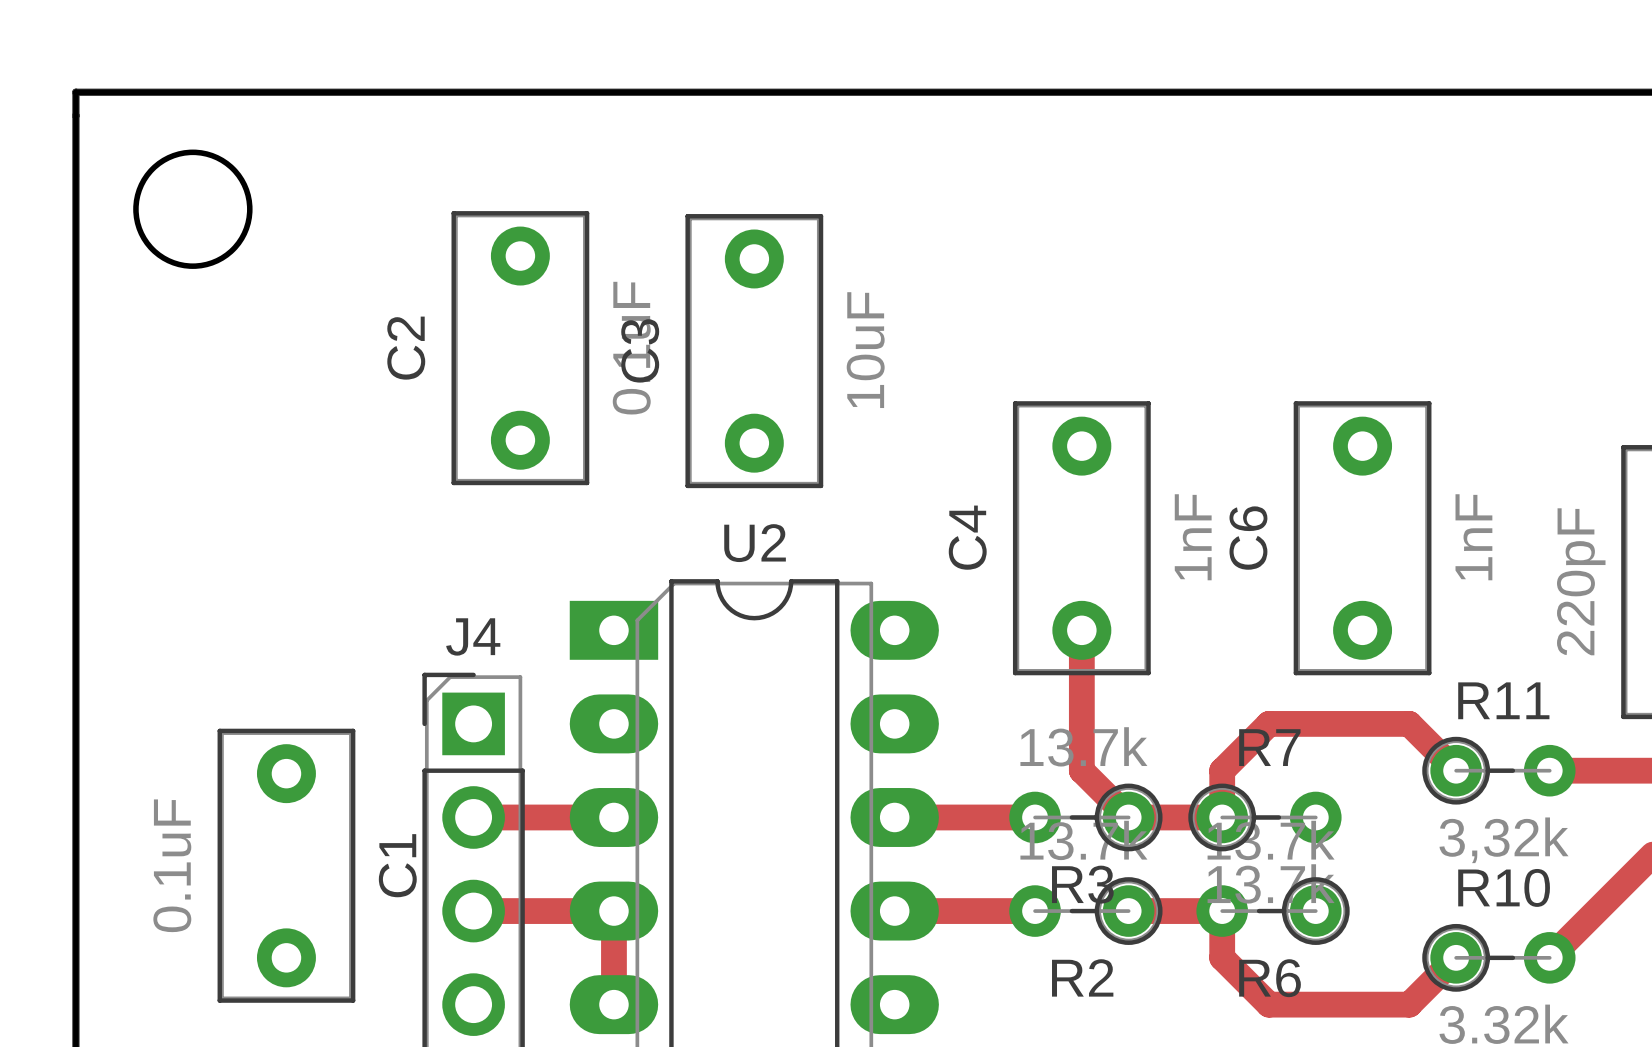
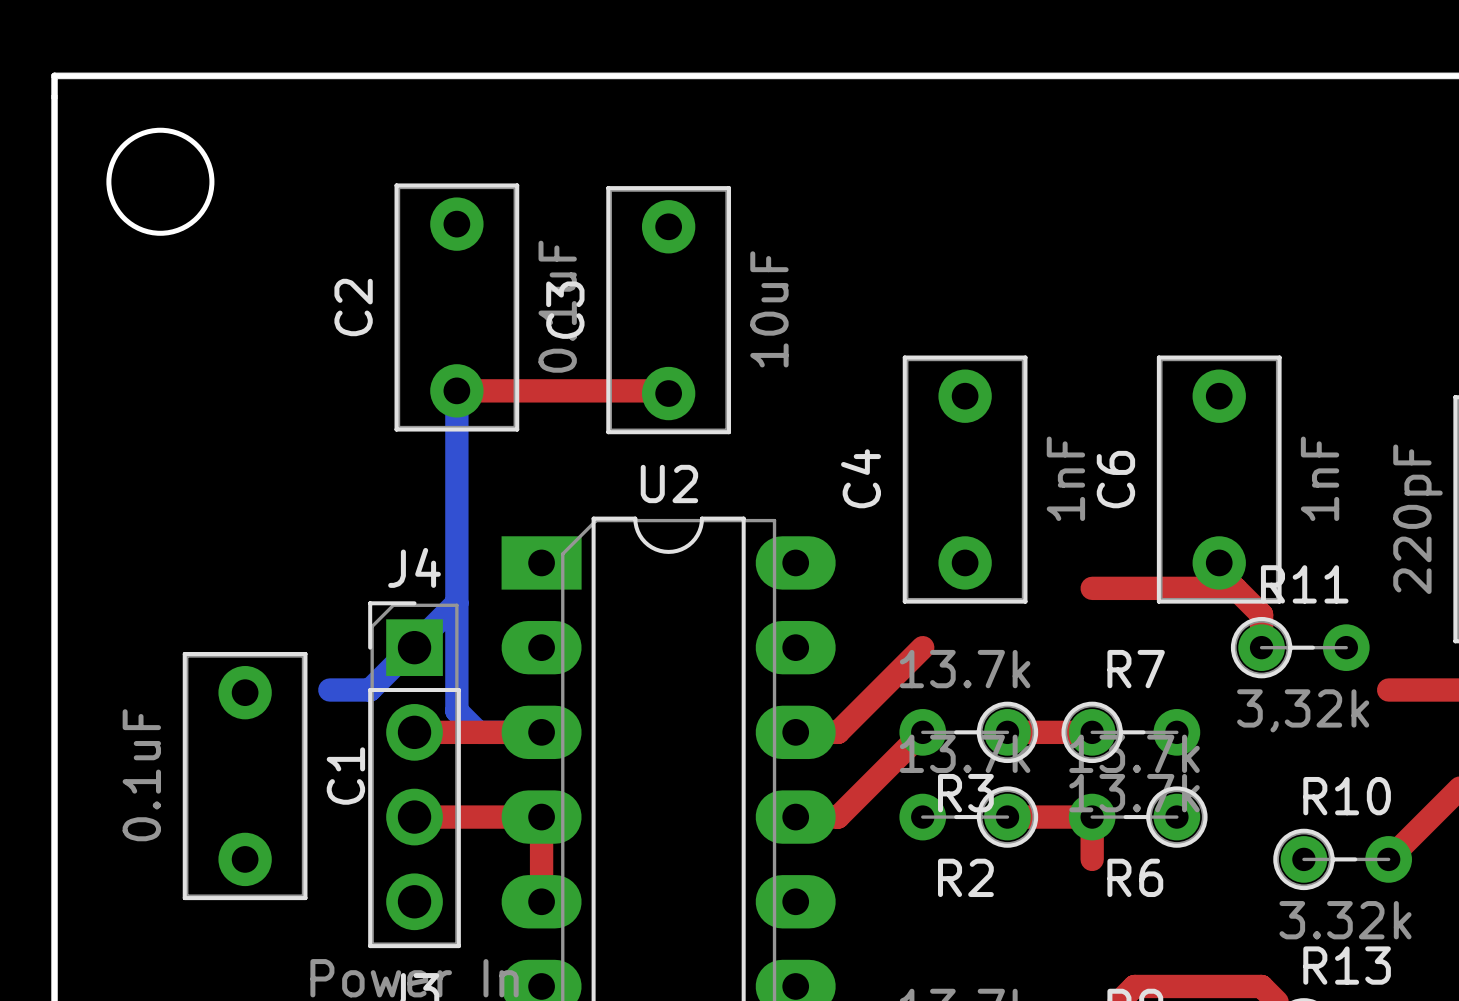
top track: none -> (456, 390) (665, 390) (668, 393)
bottom track: none -> (456, 390) (456, 711) (478, 732) (541, 732)
top track: (1081, 630) (1081, 770) (1128, 817) -> none
top track: none -> (1092, 588) (1235, 588) (1261, 614) (1261, 647)
bottom track: none -> (456, 603) (369, 690) (329, 690)
top track: (1456, 770) (1409, 723) (1268, 723) (1222, 770) (1222, 817) -> none
R11 position: (1498, 770) -> (1300, 647)
top track: (941, 817) (1035, 817) -> (838, 732) (922, 647)
top track: (941, 911) (1035, 911) -> (838, 817) (922, 732)
top track: (1222, 957) (1268, 1004) (1409, 1004) (1456, 957) -> none

